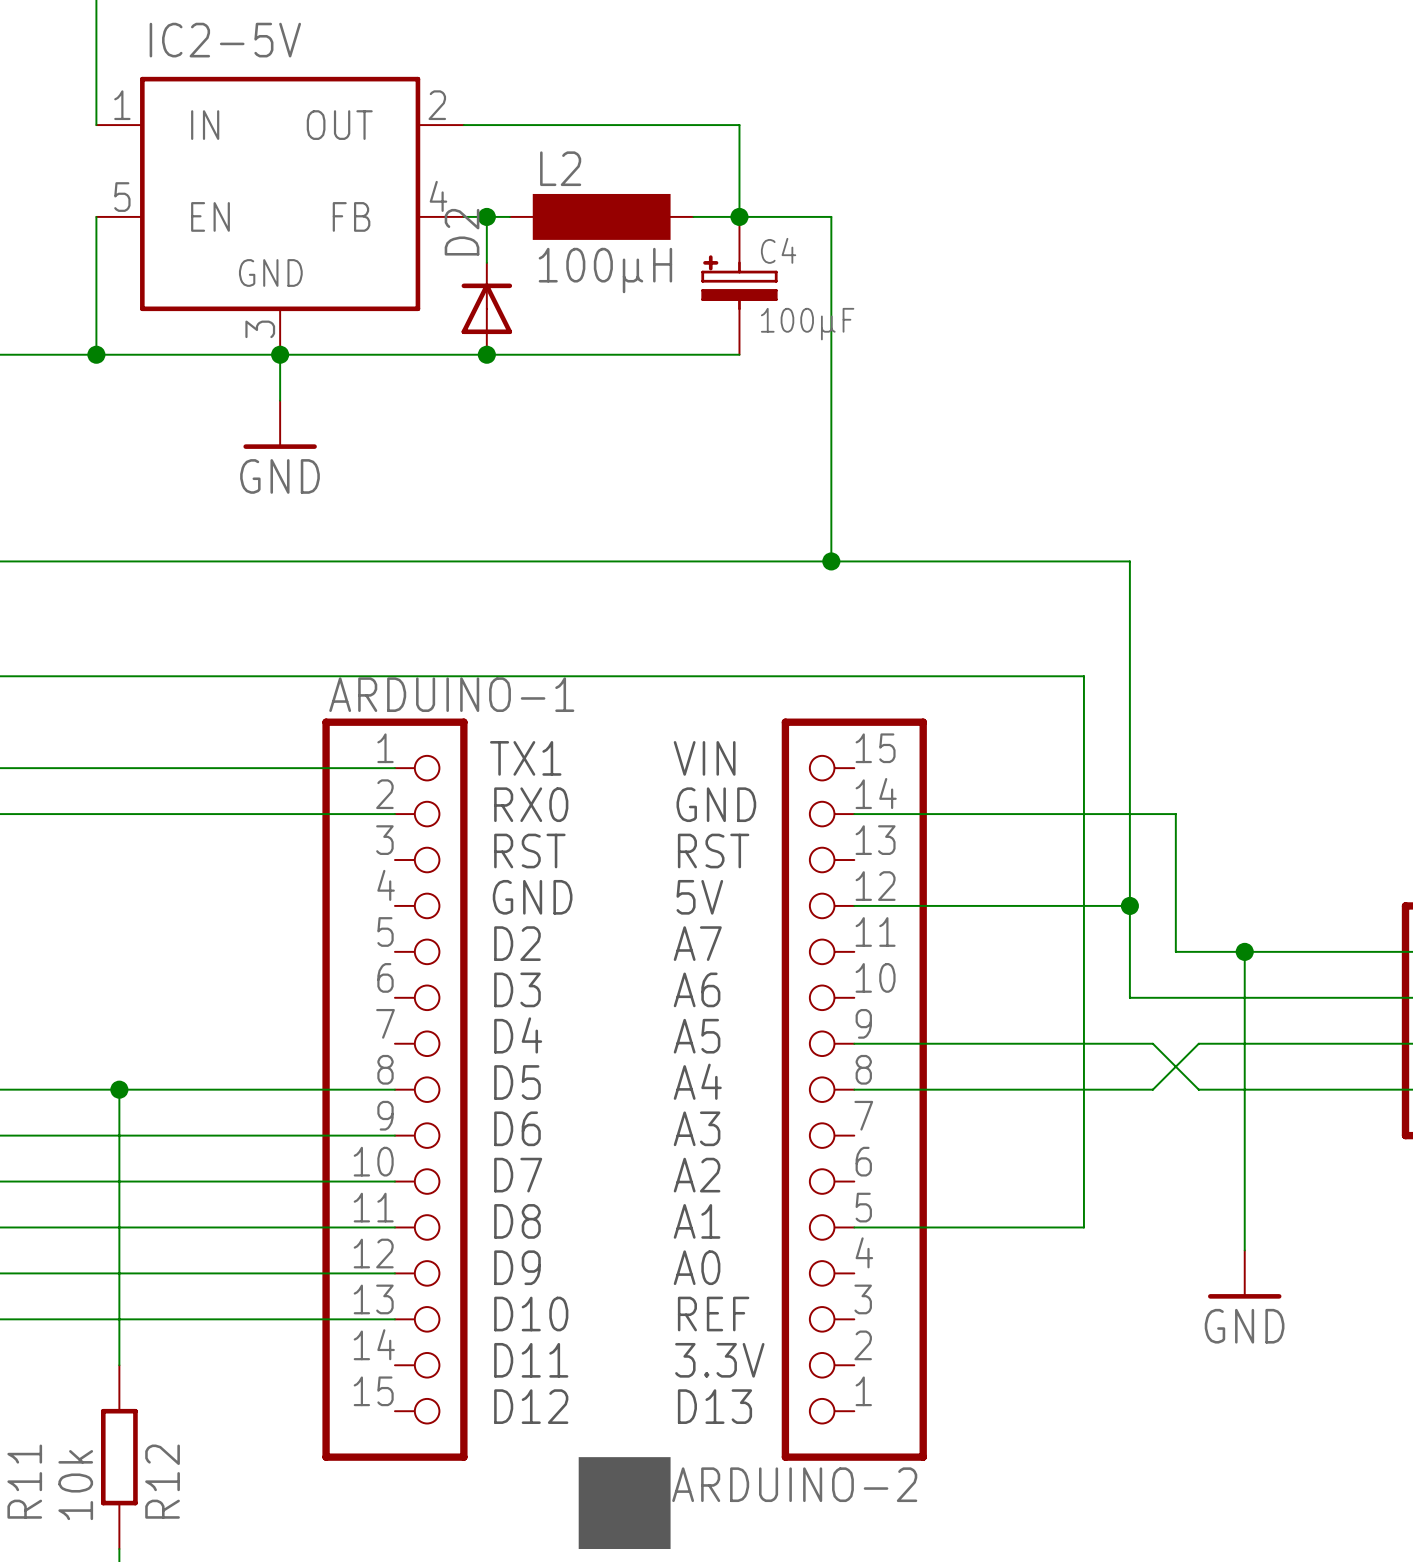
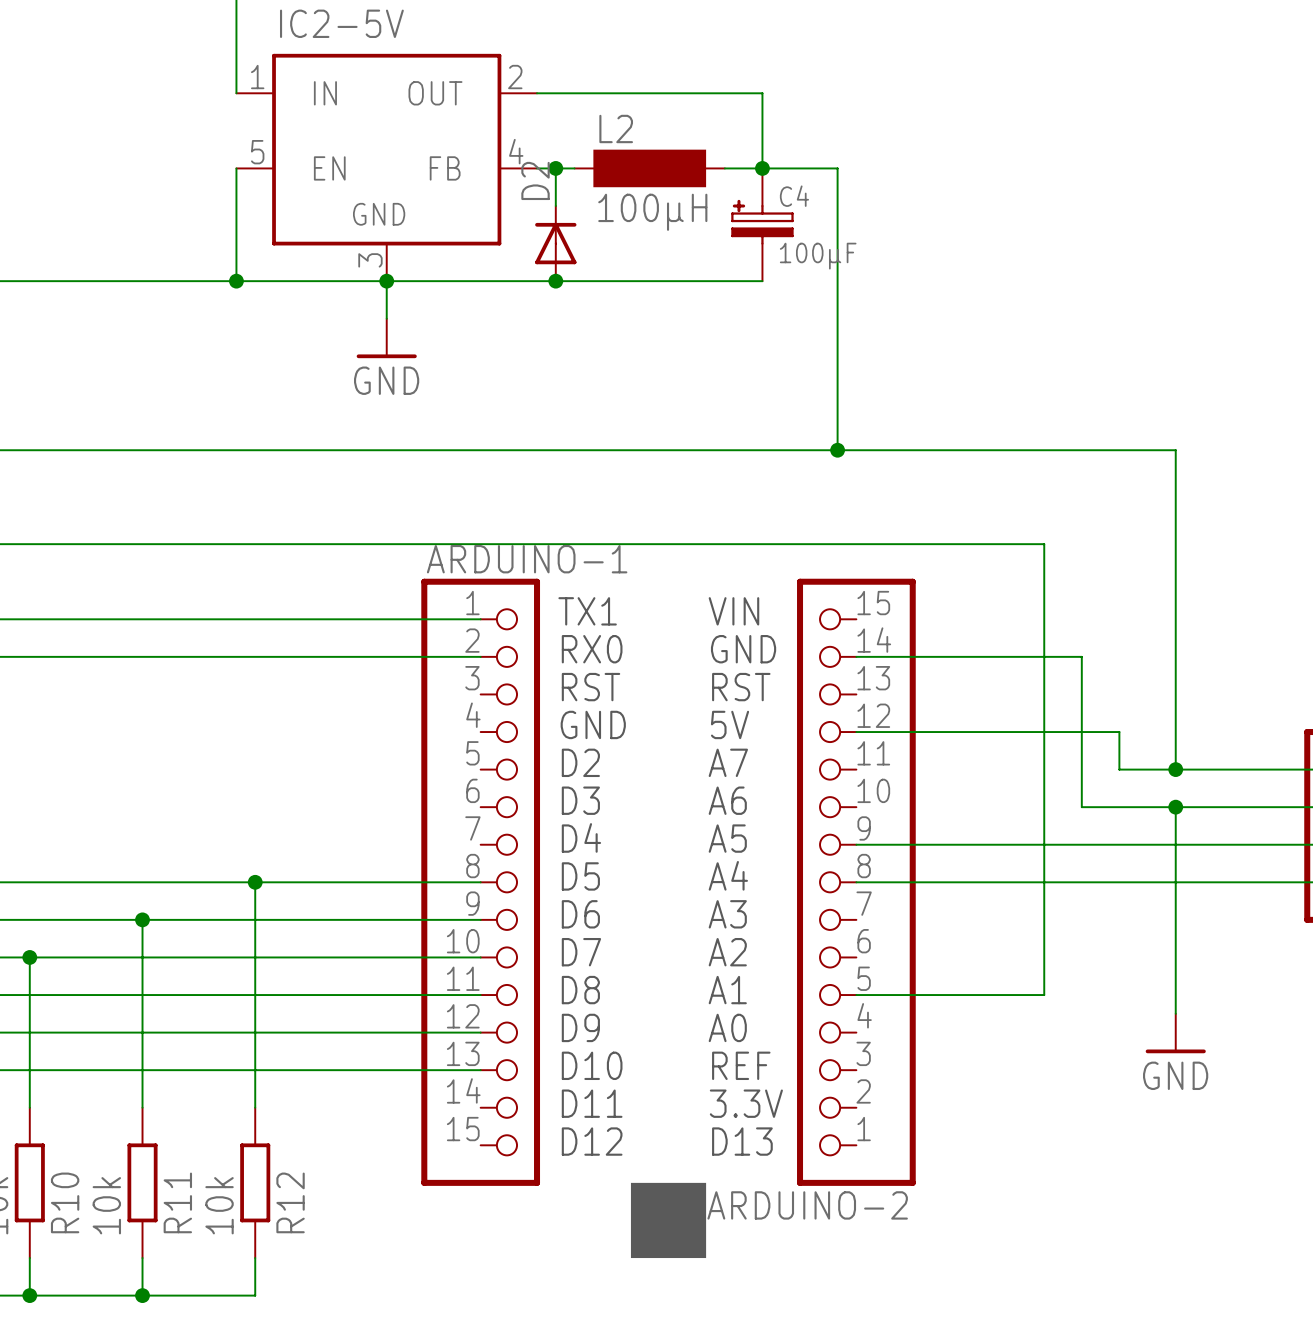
wire: (1129, 561) (1129, 814) (1175, 814) (1175, 905) -> (1081, 450) (1175, 450) (1175, 769)
wire: none -> (1081, 732) (1119, 732)
junction: (1129, 905) -> none
wire: (1244, 951) (1244, 997) -> none
junction: none -> (1175, 807)
wire: (1152, 1043) (1198, 1089) -> (1100, 844) (1138, 844)
wire: (1198, 1043) (1152, 1089) -> (1138, 882) (1100, 882)

